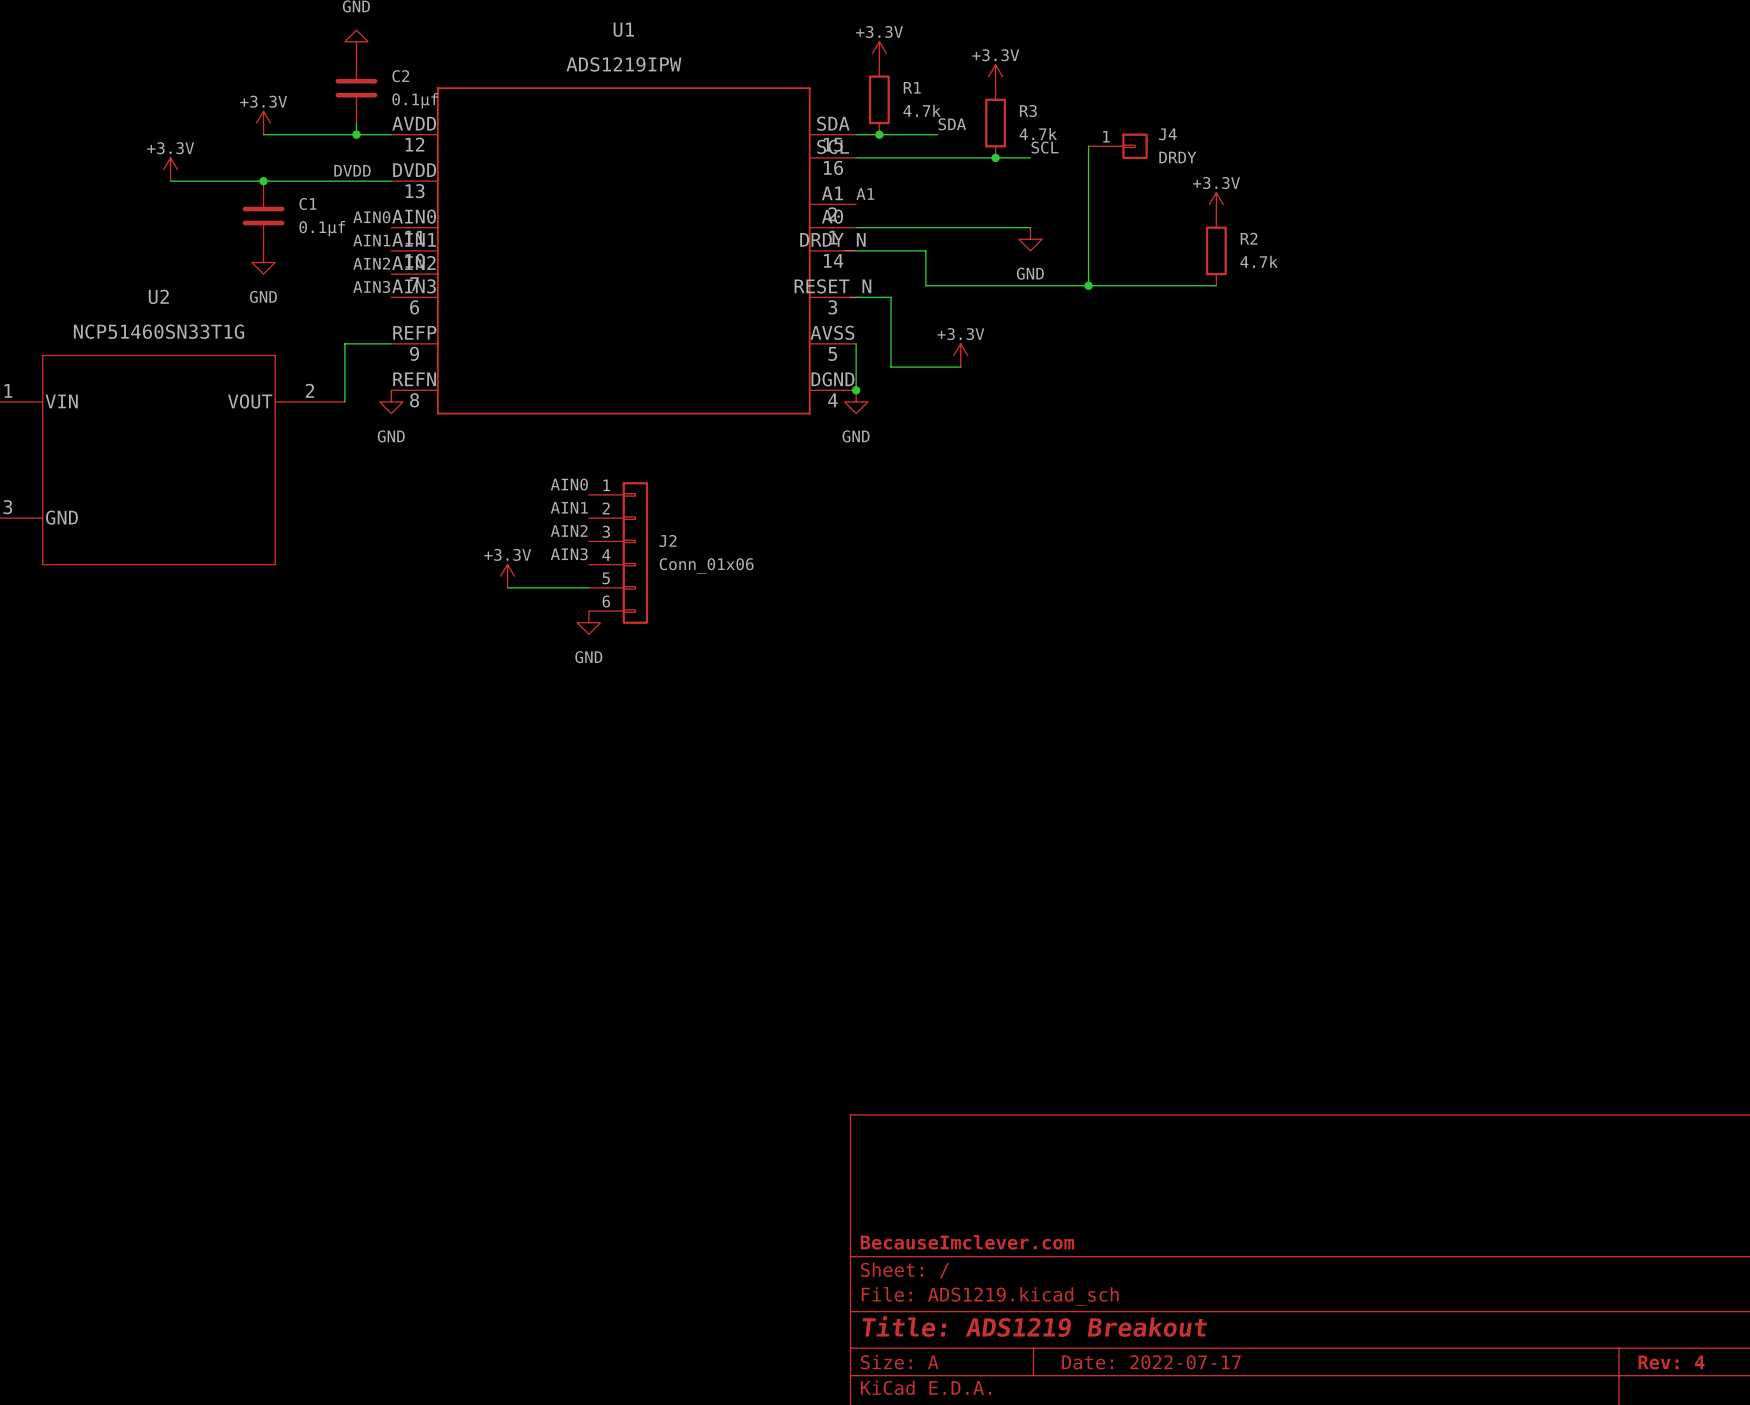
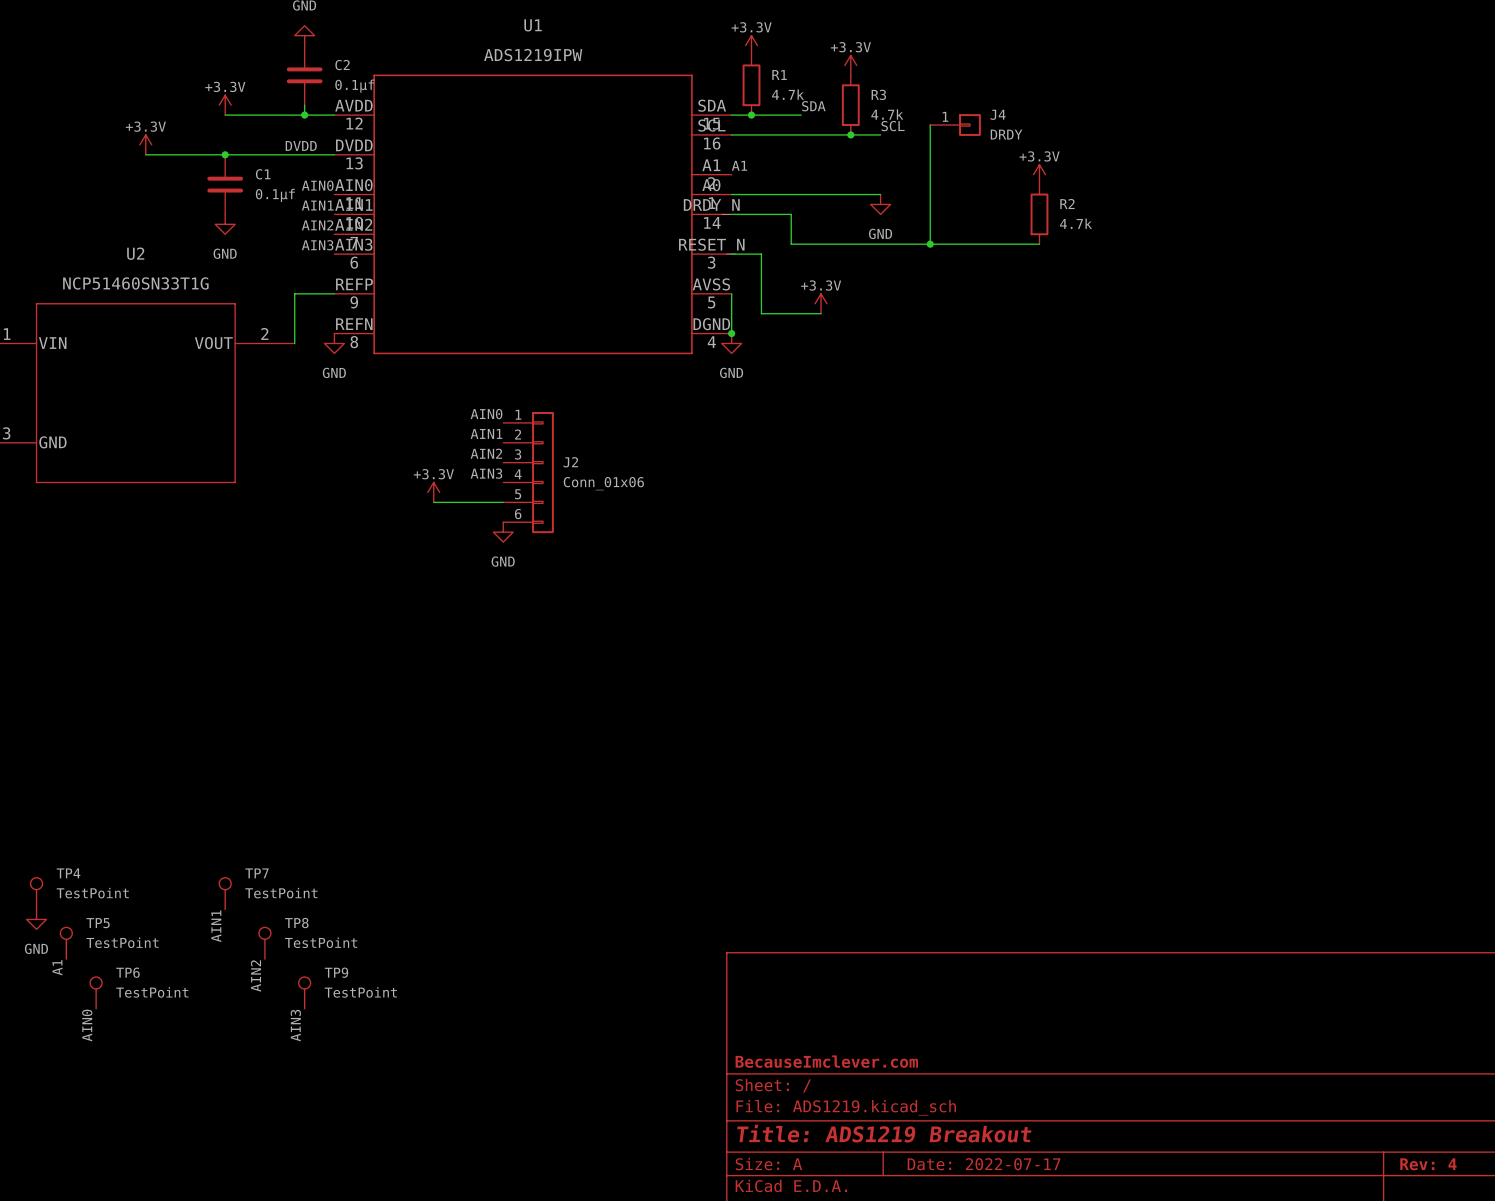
TP4: none -> TestPoint (36, 893)
TP7: none -> TestPoint (225, 893)
power symbol: none -> GND (36, 919)
label: none -> AIN1 (216, 926)
TP5: none -> TestPoint (66, 943)
TP8: none -> TestPoint (264, 943)
label: none -> A1 (57, 967)
label: none -> AIN2 (255, 976)
TP6: none -> TestPoint (96, 992)
TP9: none -> TestPoint (304, 992)
label: none -> AIN0 (87, 1025)
label: none -> AIN3 (295, 1025)

